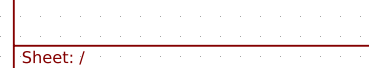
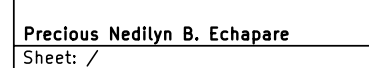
title block: none -> Precious Nedilyn B. Echapare (156, 35)

